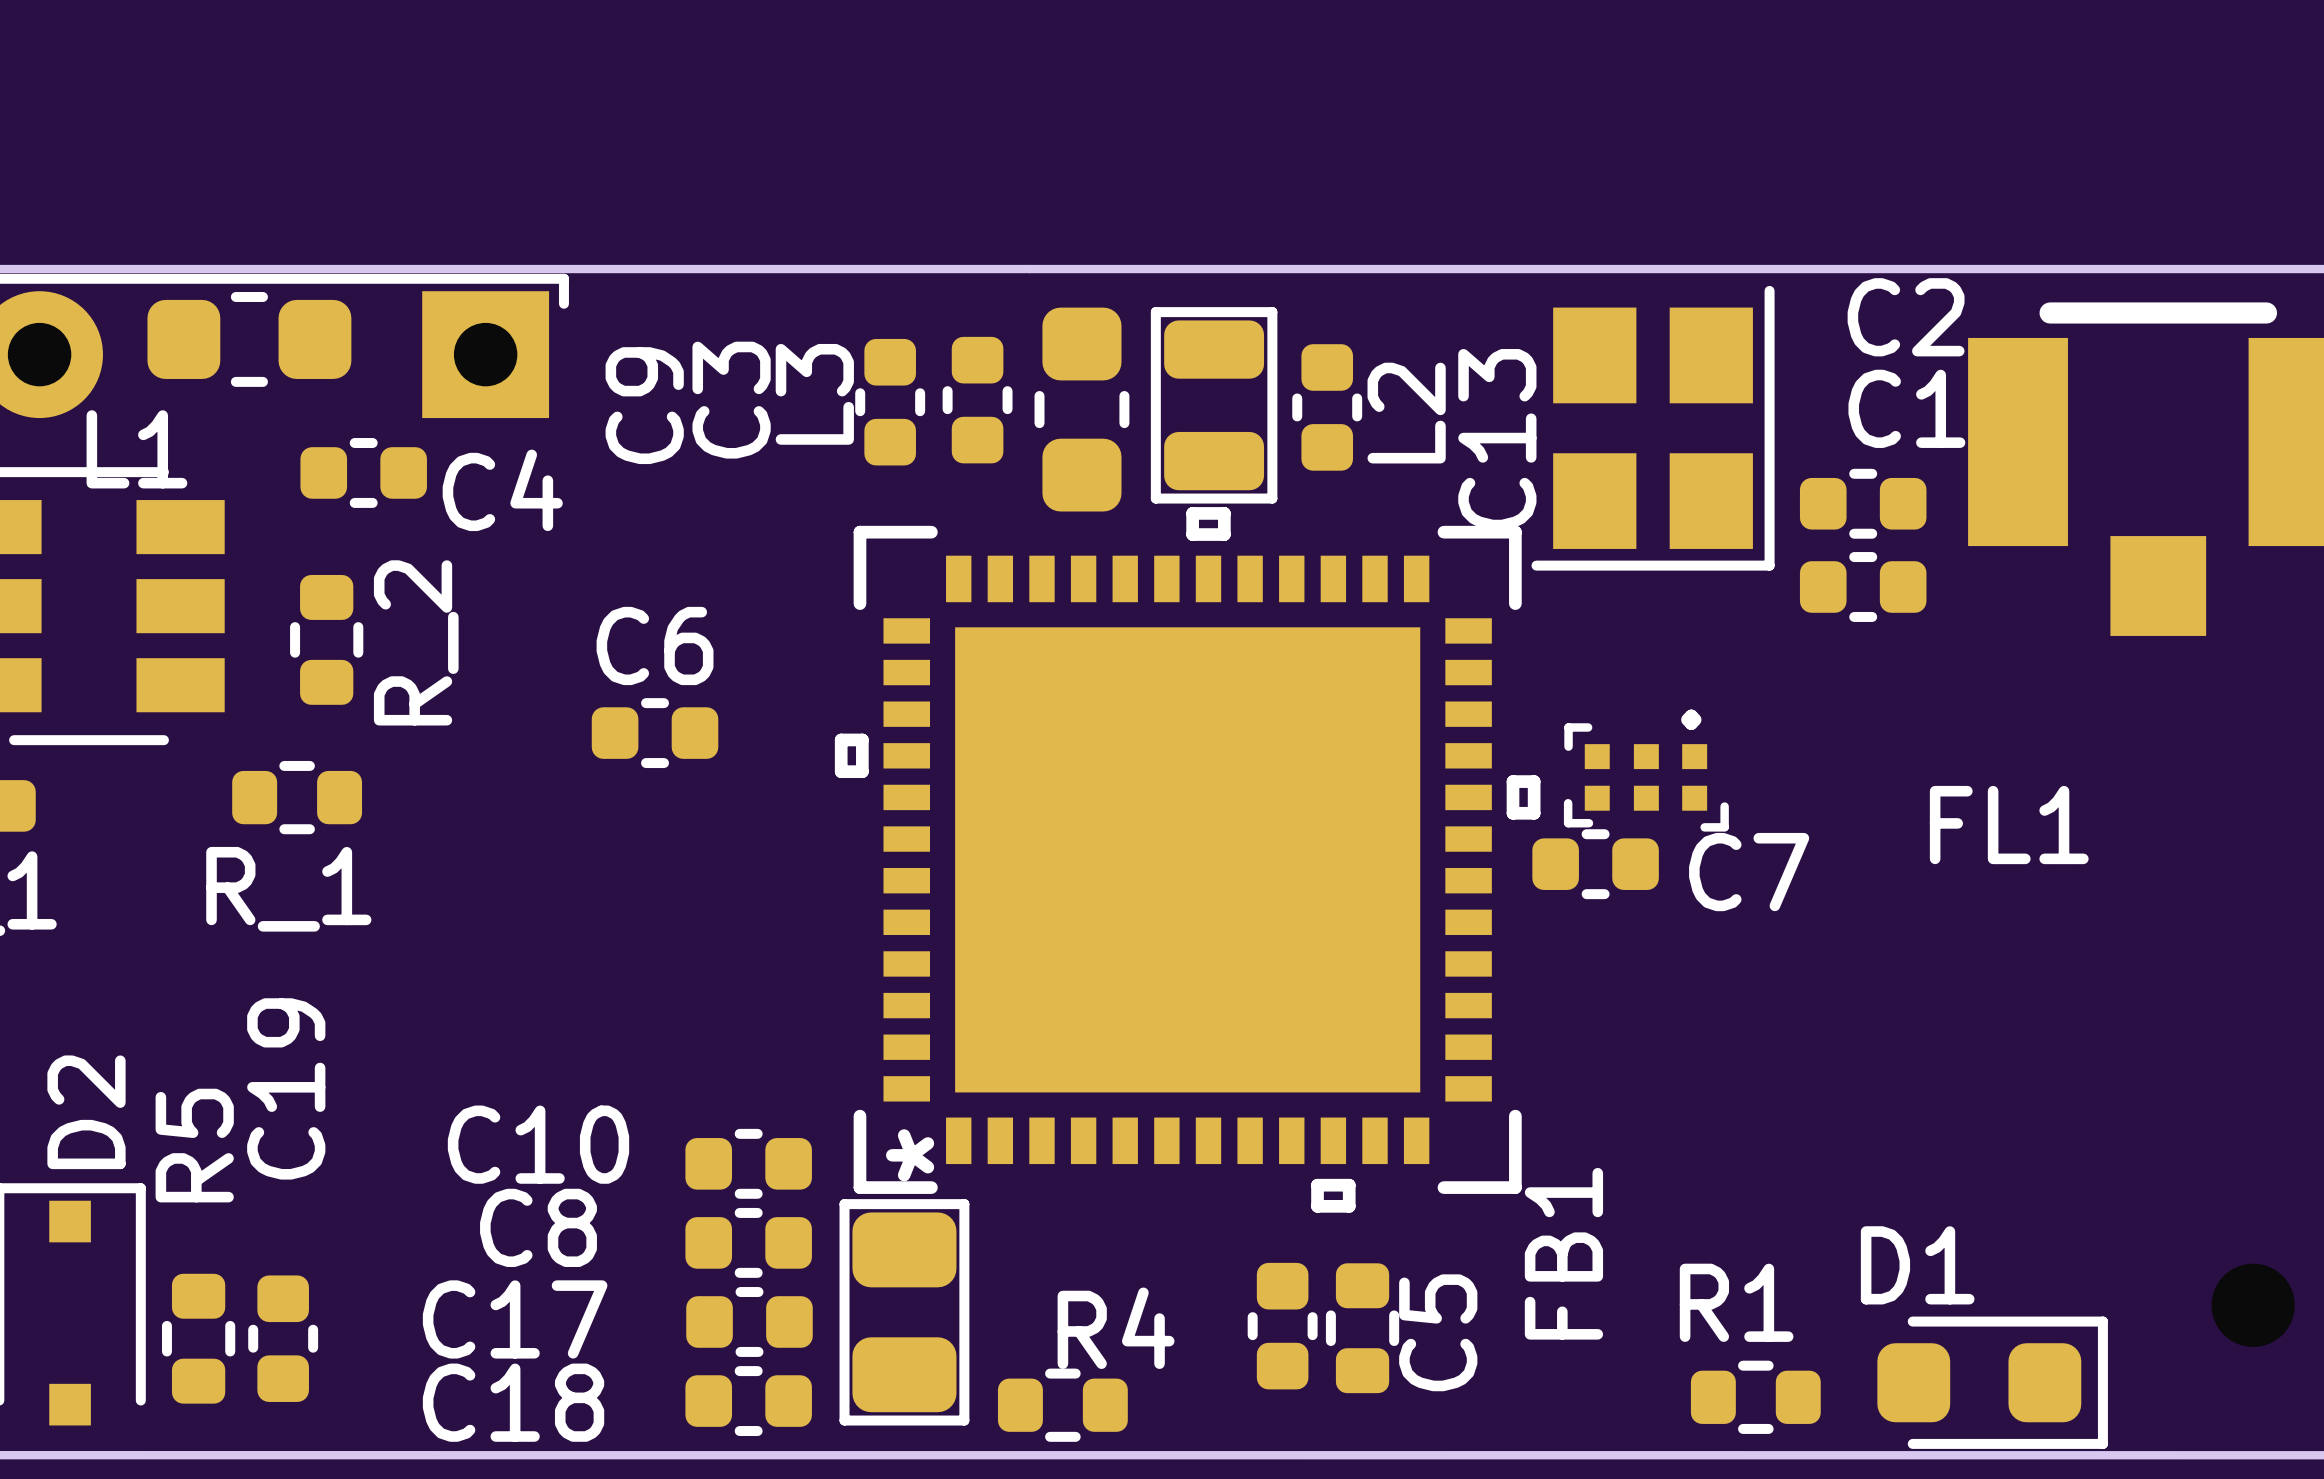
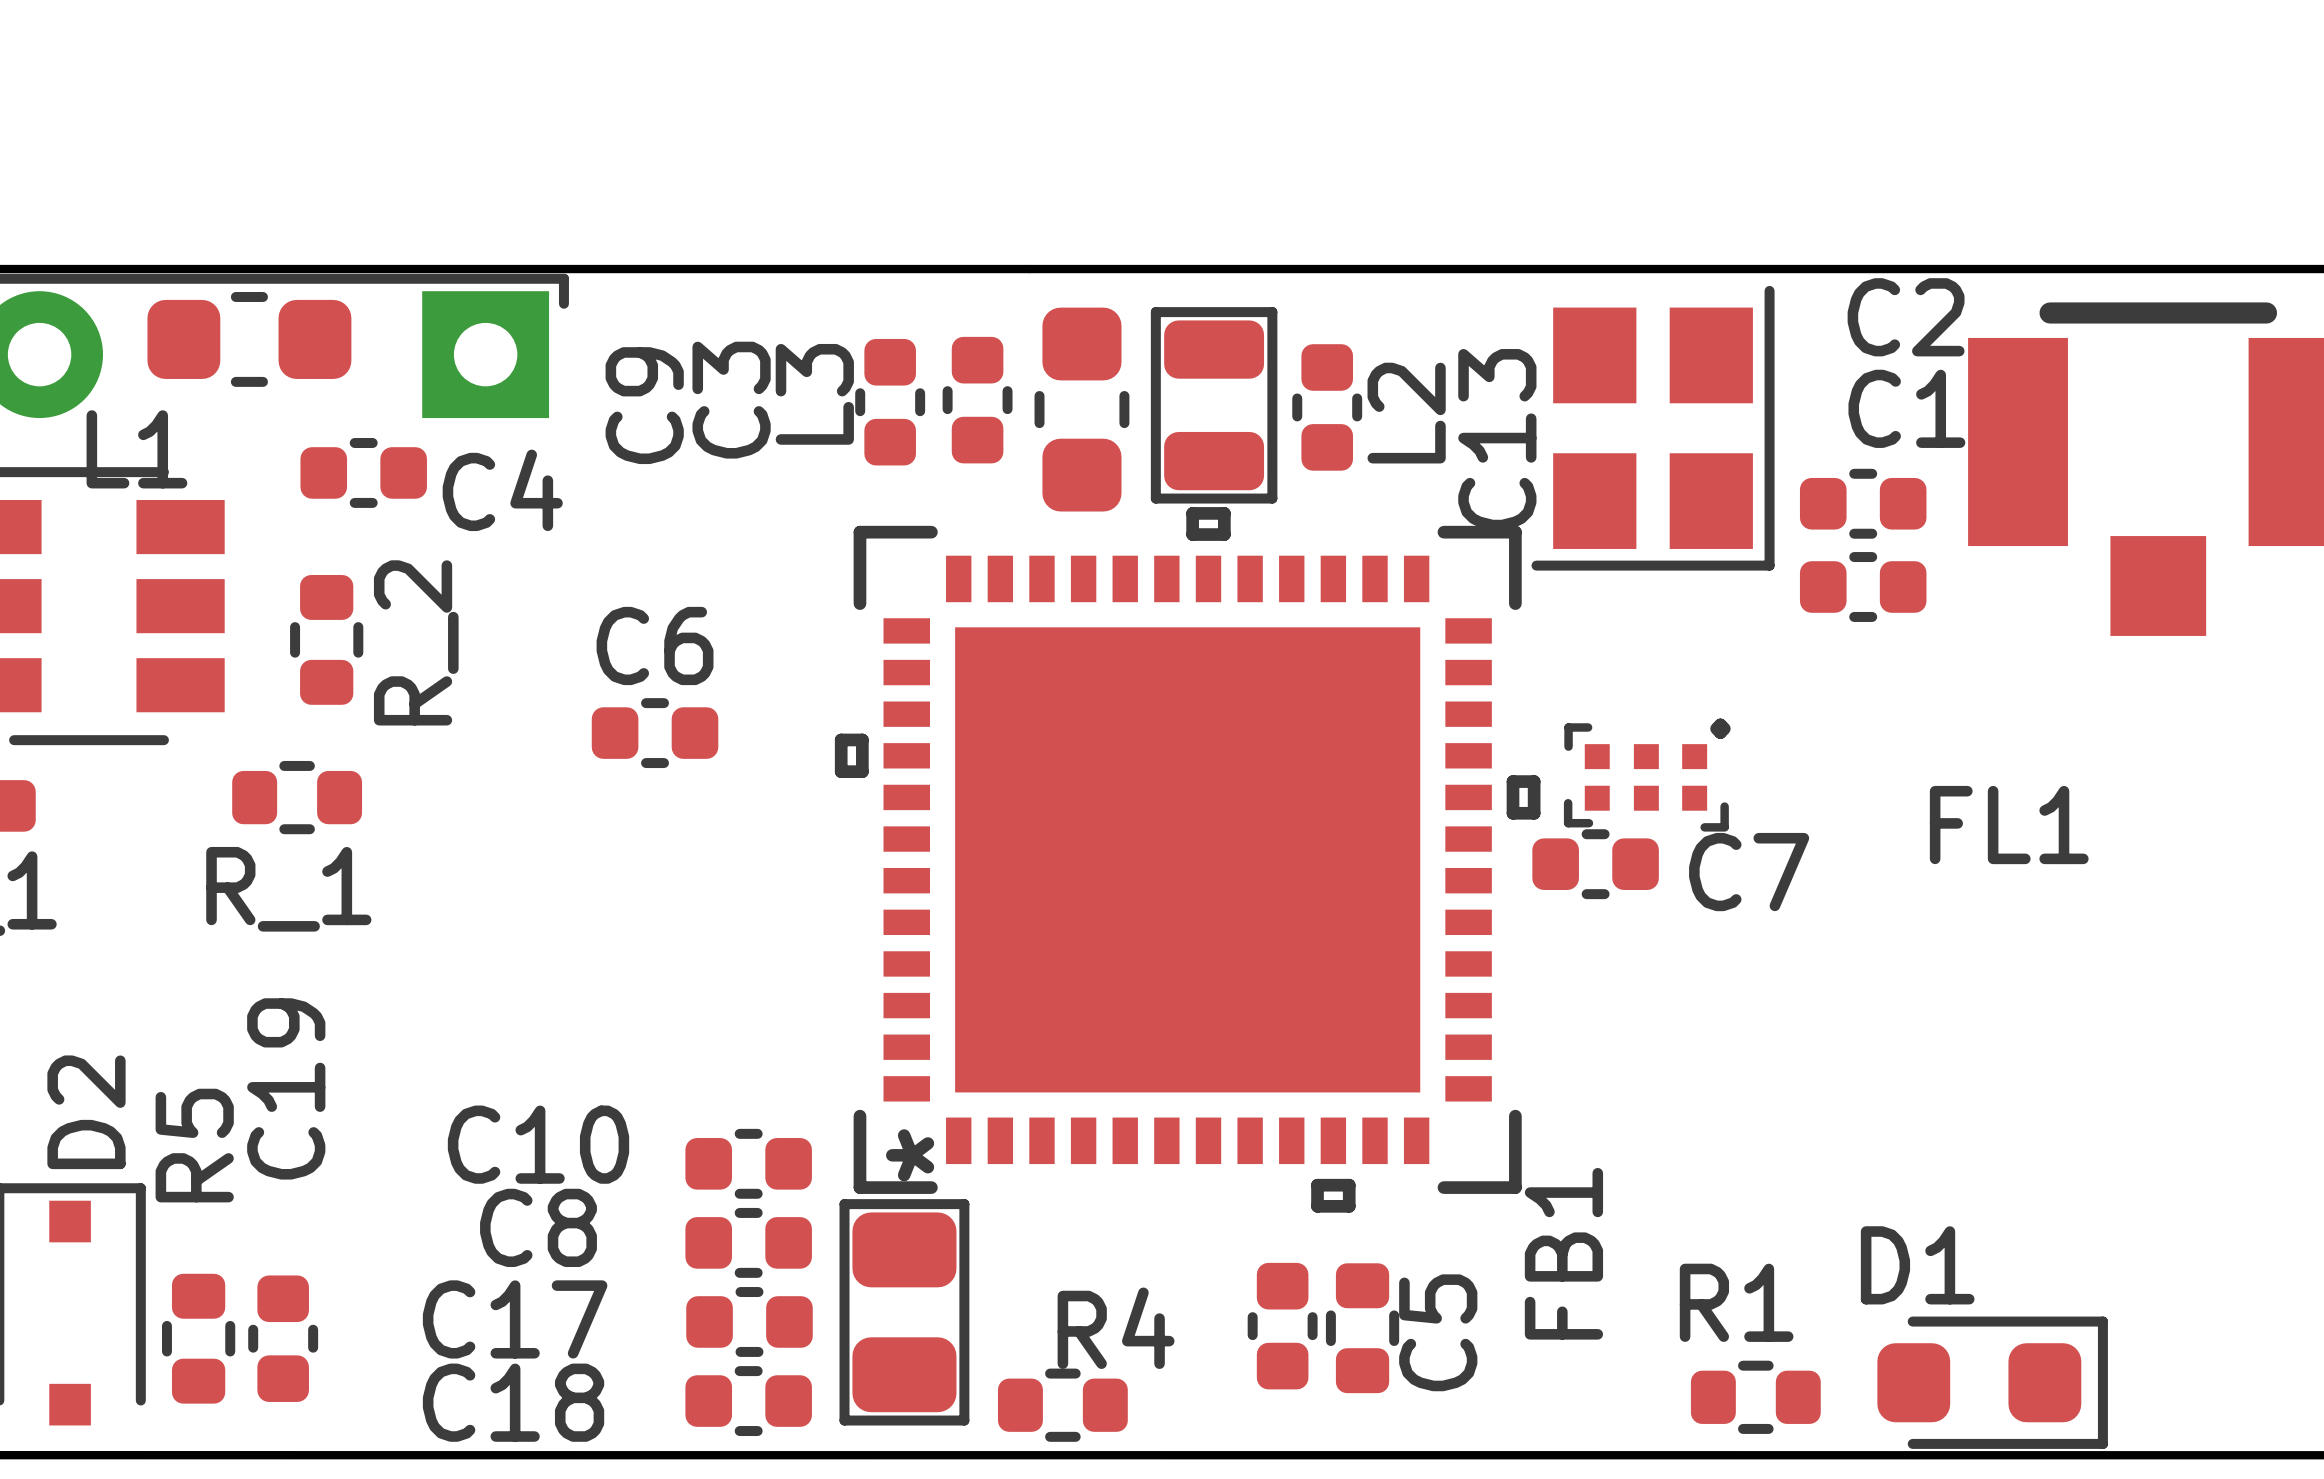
FL1 text position: . (1691, 719) -> . (1720, 728)

